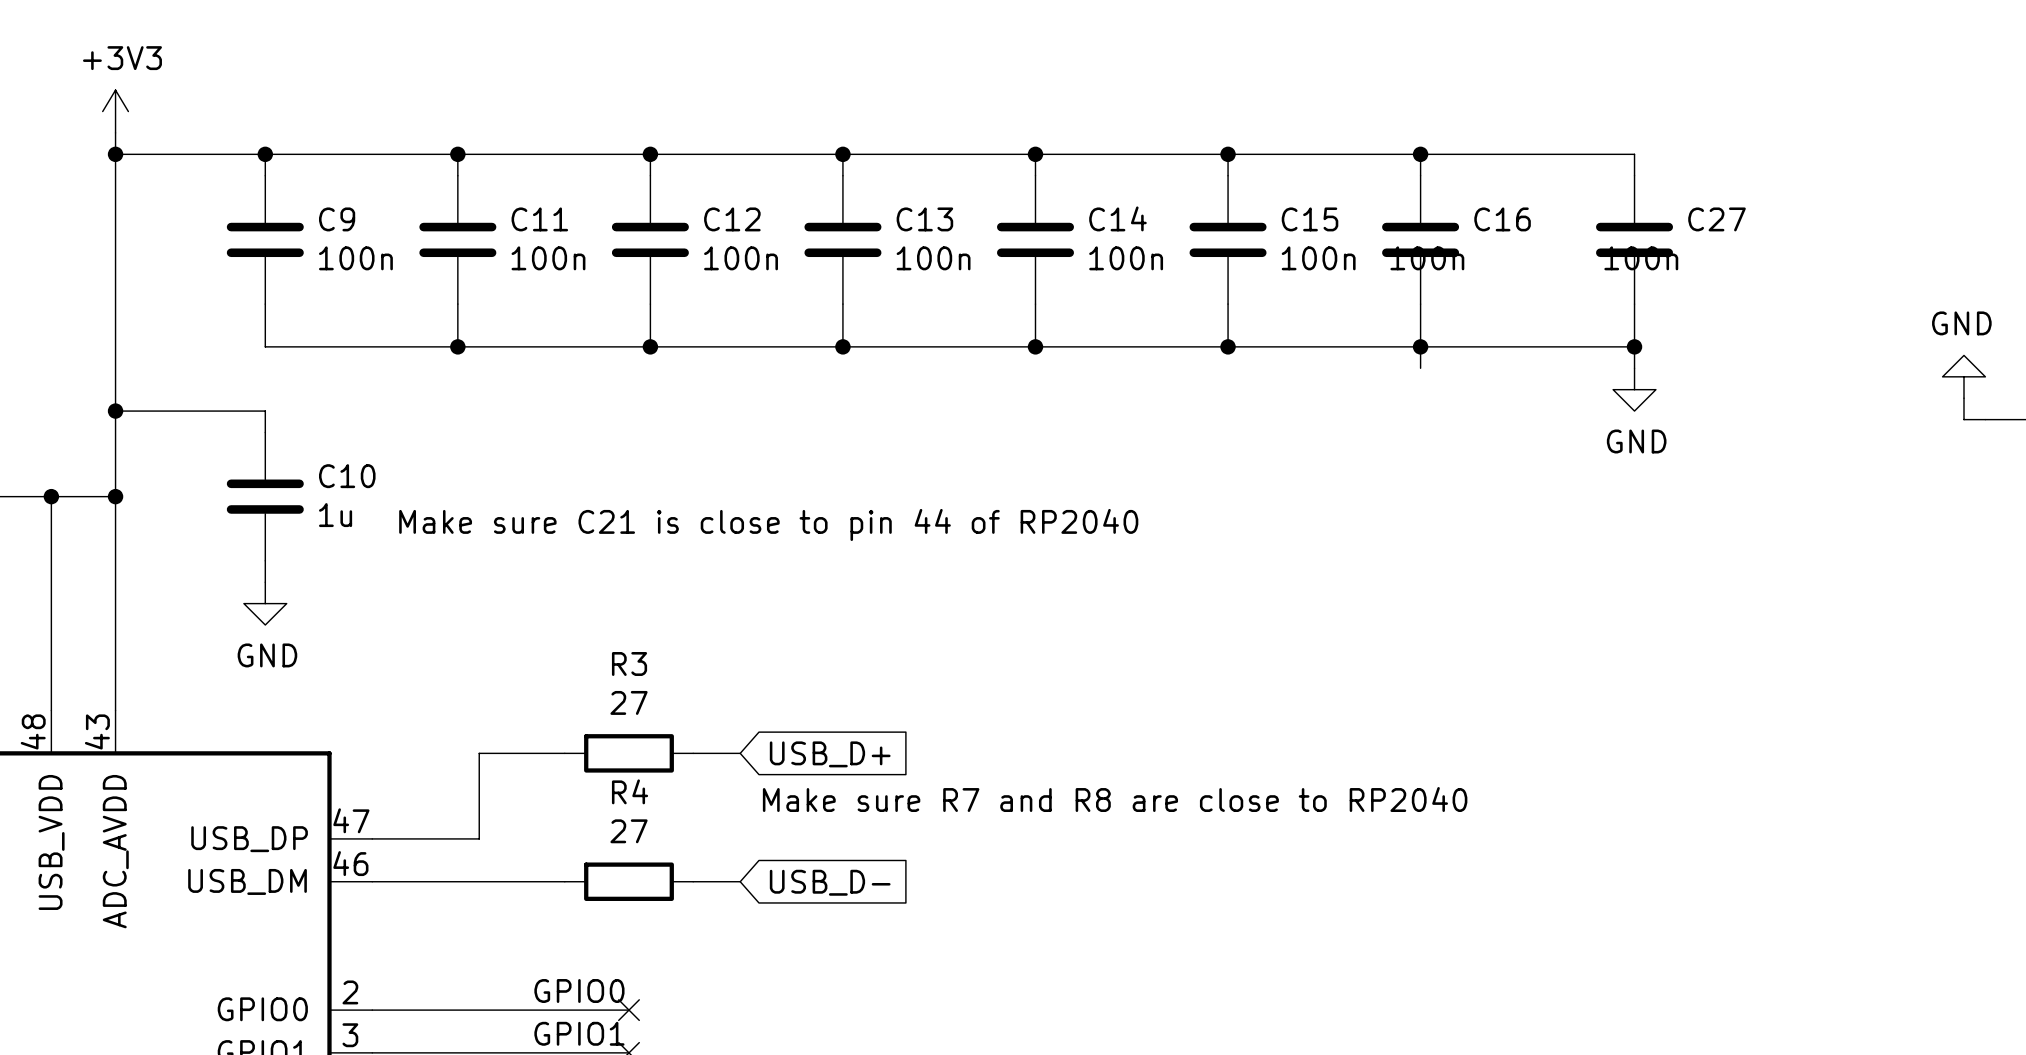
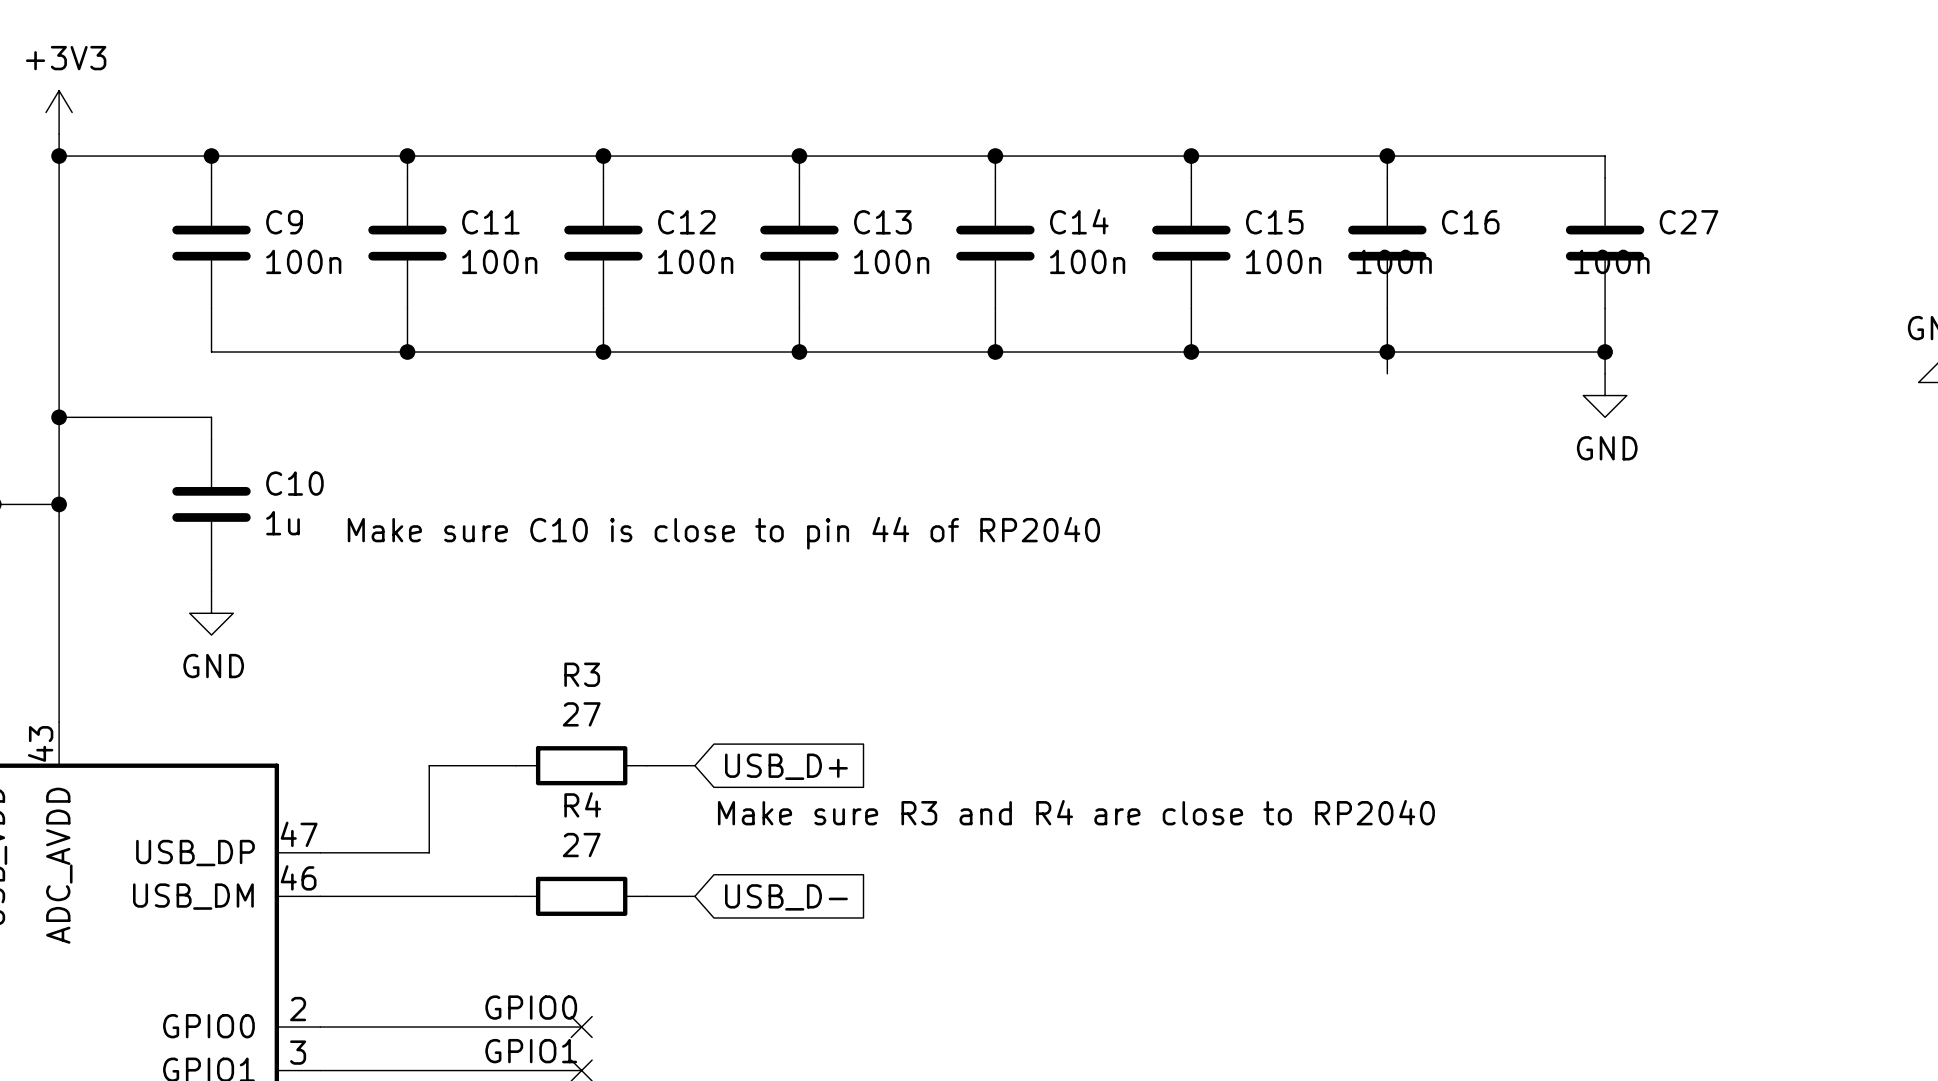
text: Make sure C21 is close to pin 44 of RP2040 (768, 524) -> Make sure C10 is close to pin 44 of RP2040 (723, 533)
text: Make sure R7 and R8 are close to RP2040 (1115, 799) -> Make sure R3 and R4 are close to RP2040 (1076, 812)

